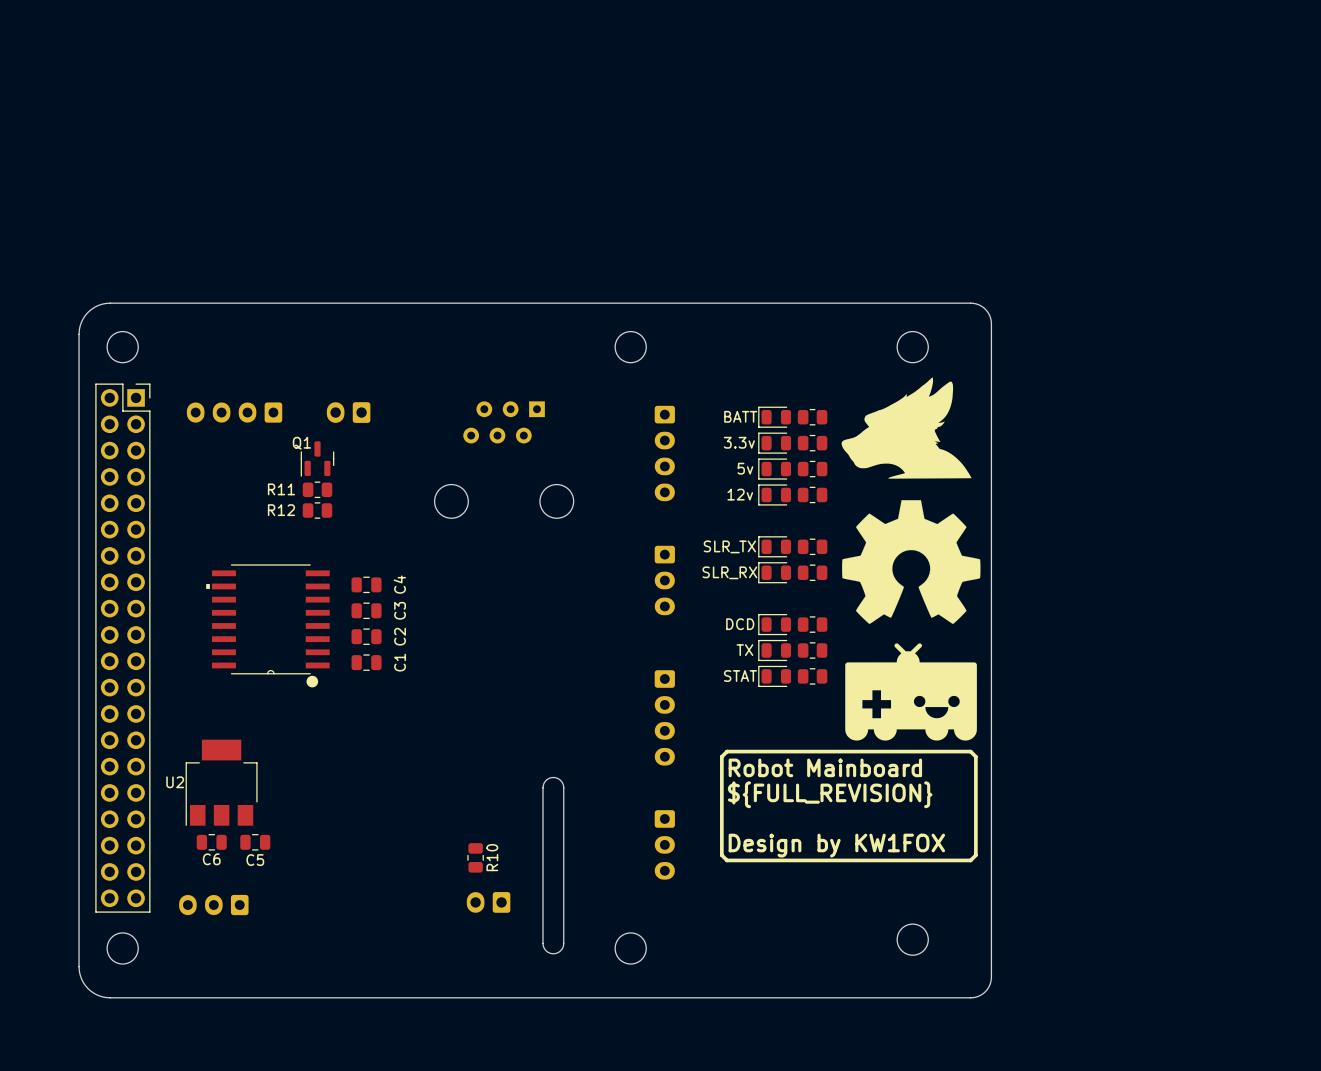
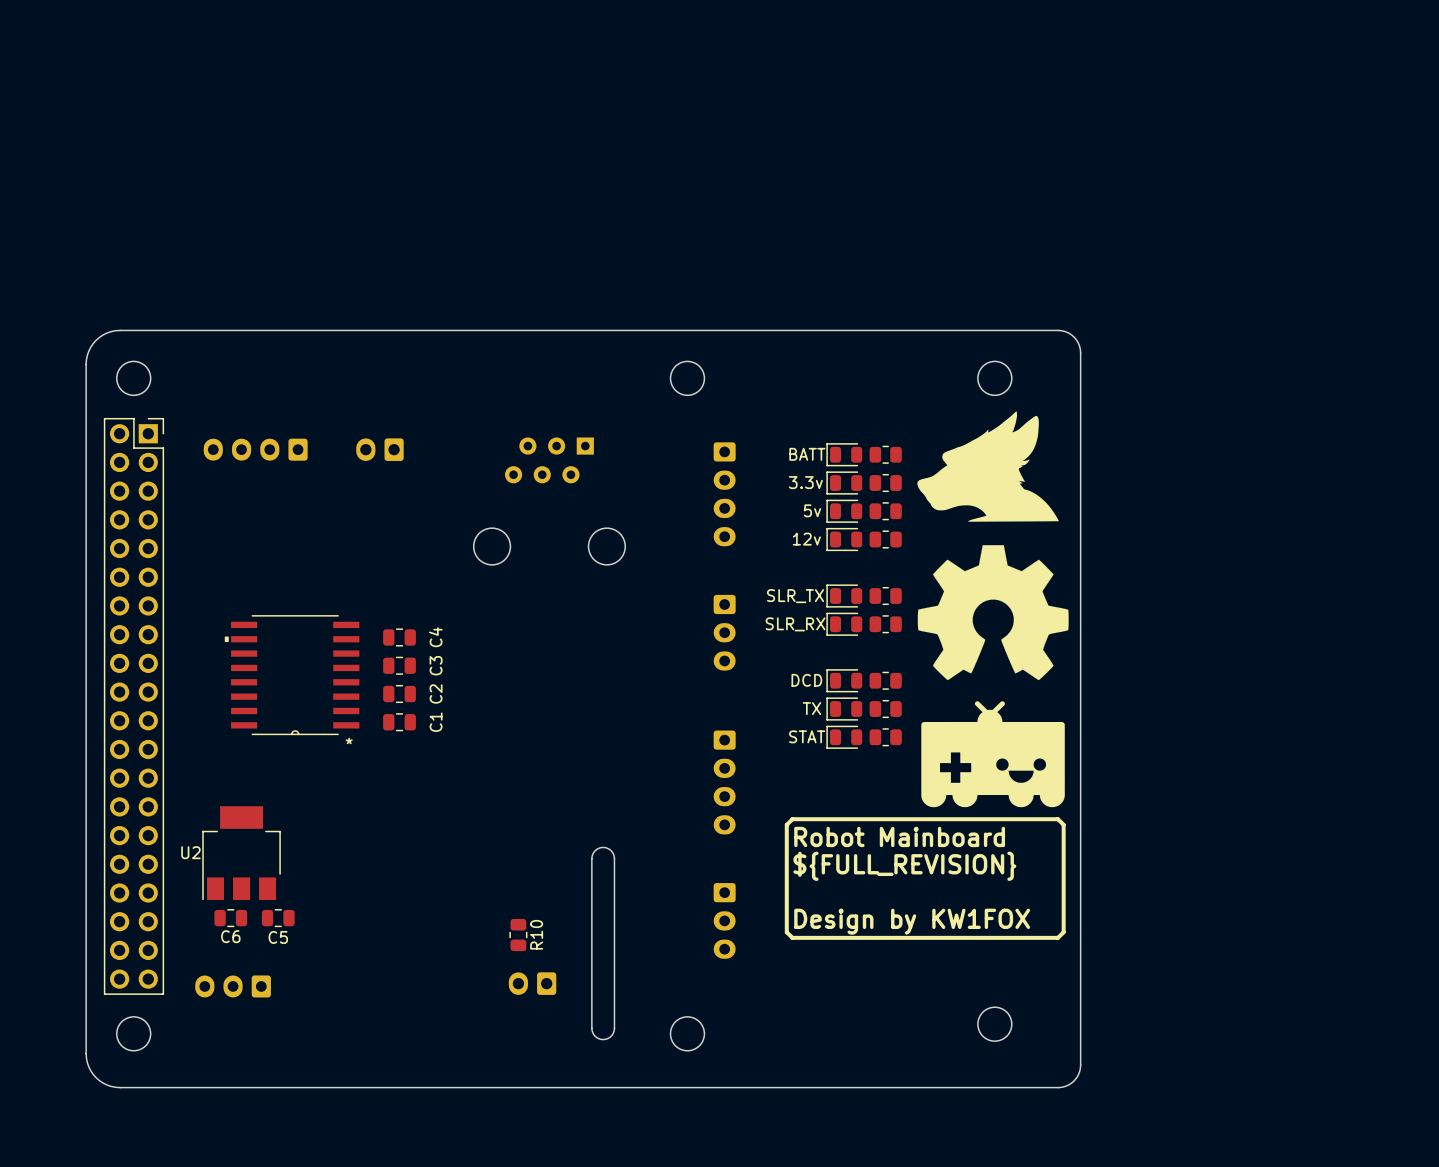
Q1: (317, 458) -> none
R11: (317, 489) -> none
R12: (317, 510) -> none
part footprint: [206, 564, 330, 688] -> [224, 615, 360, 736]

